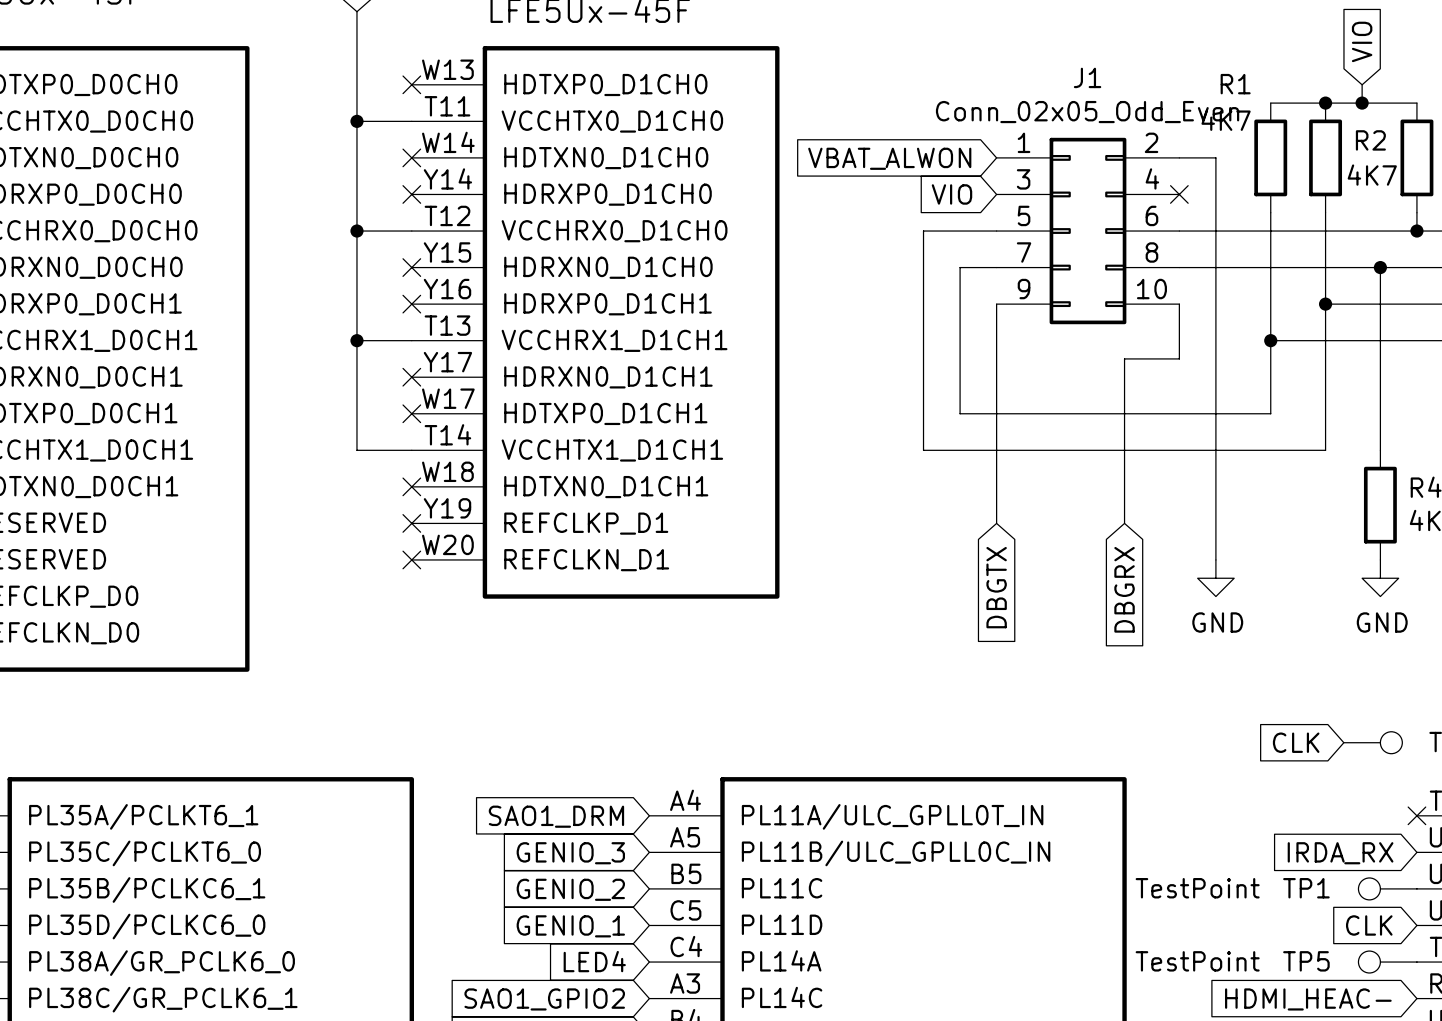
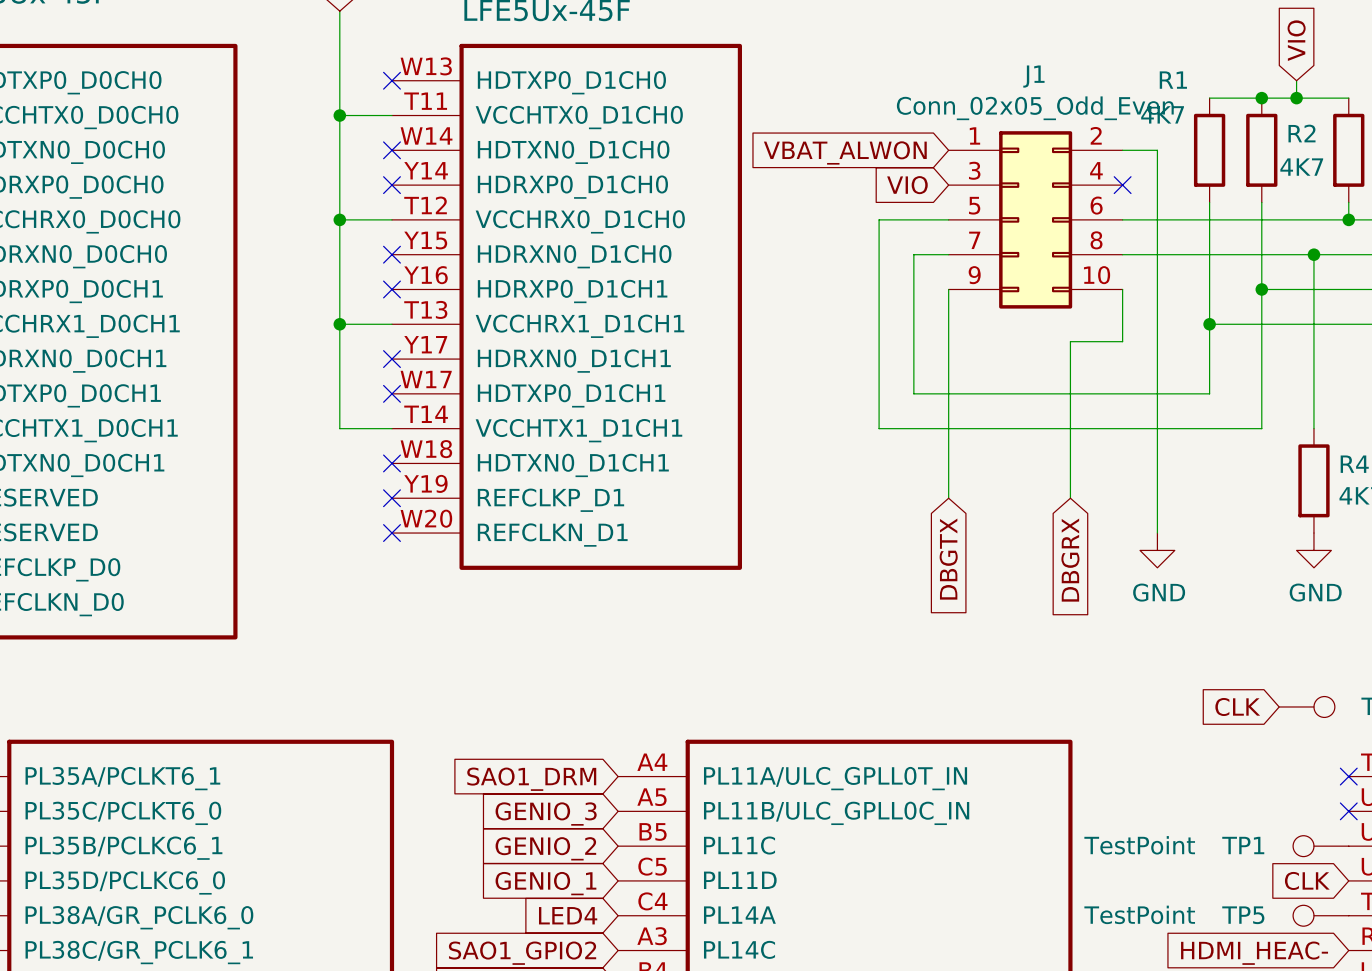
no-connect mark: none -> (1348, 811)
global label: IRDA_RX (1340, 853) -> none

